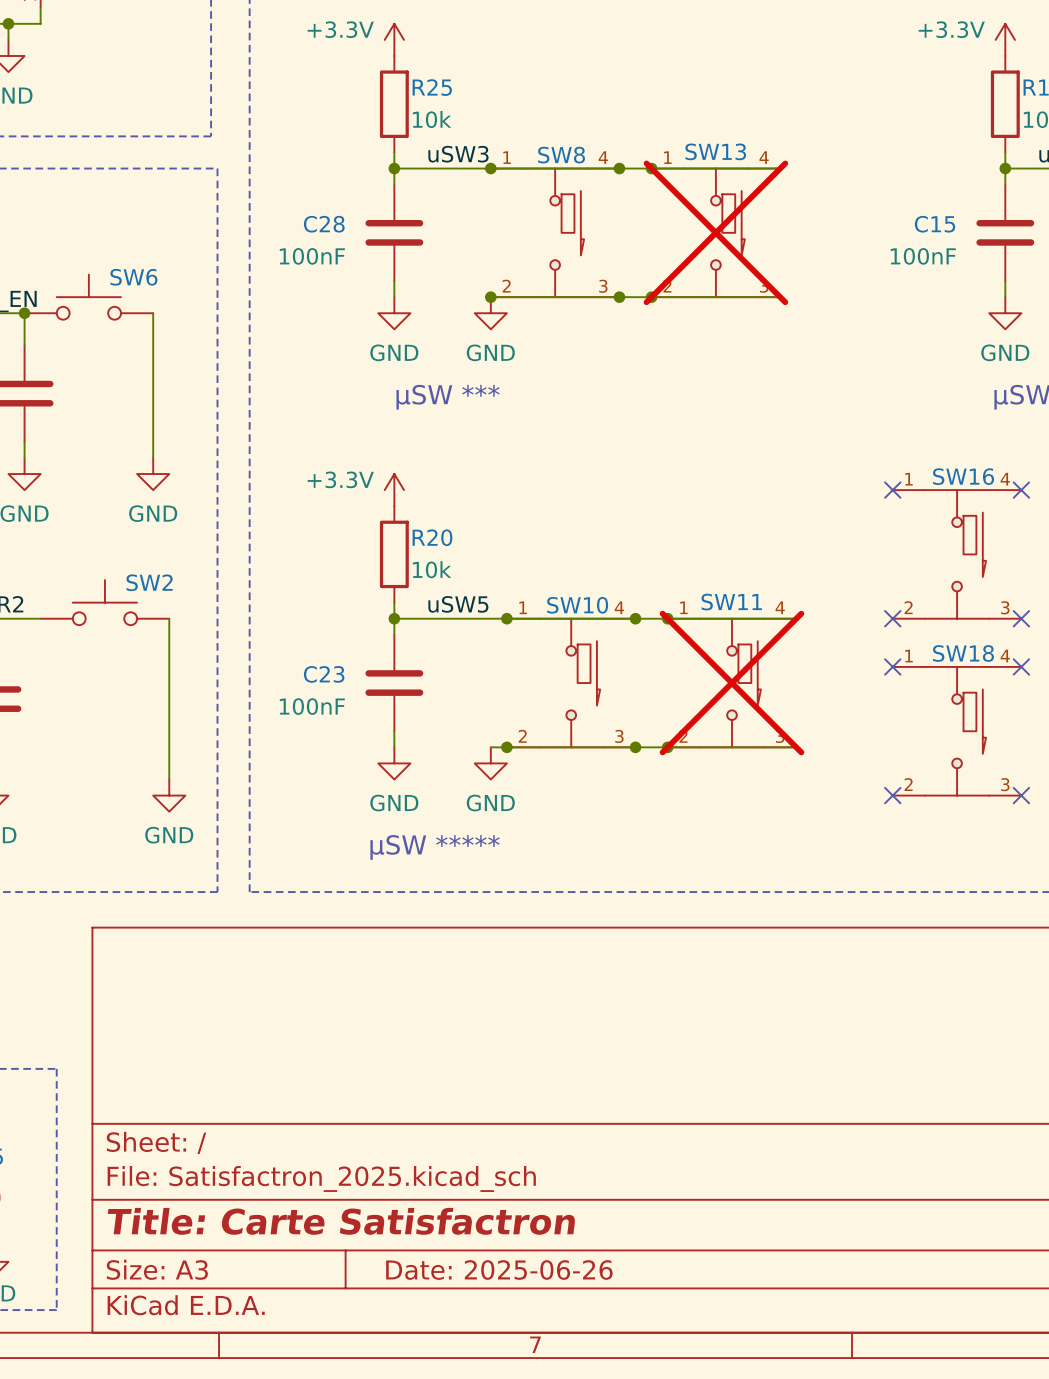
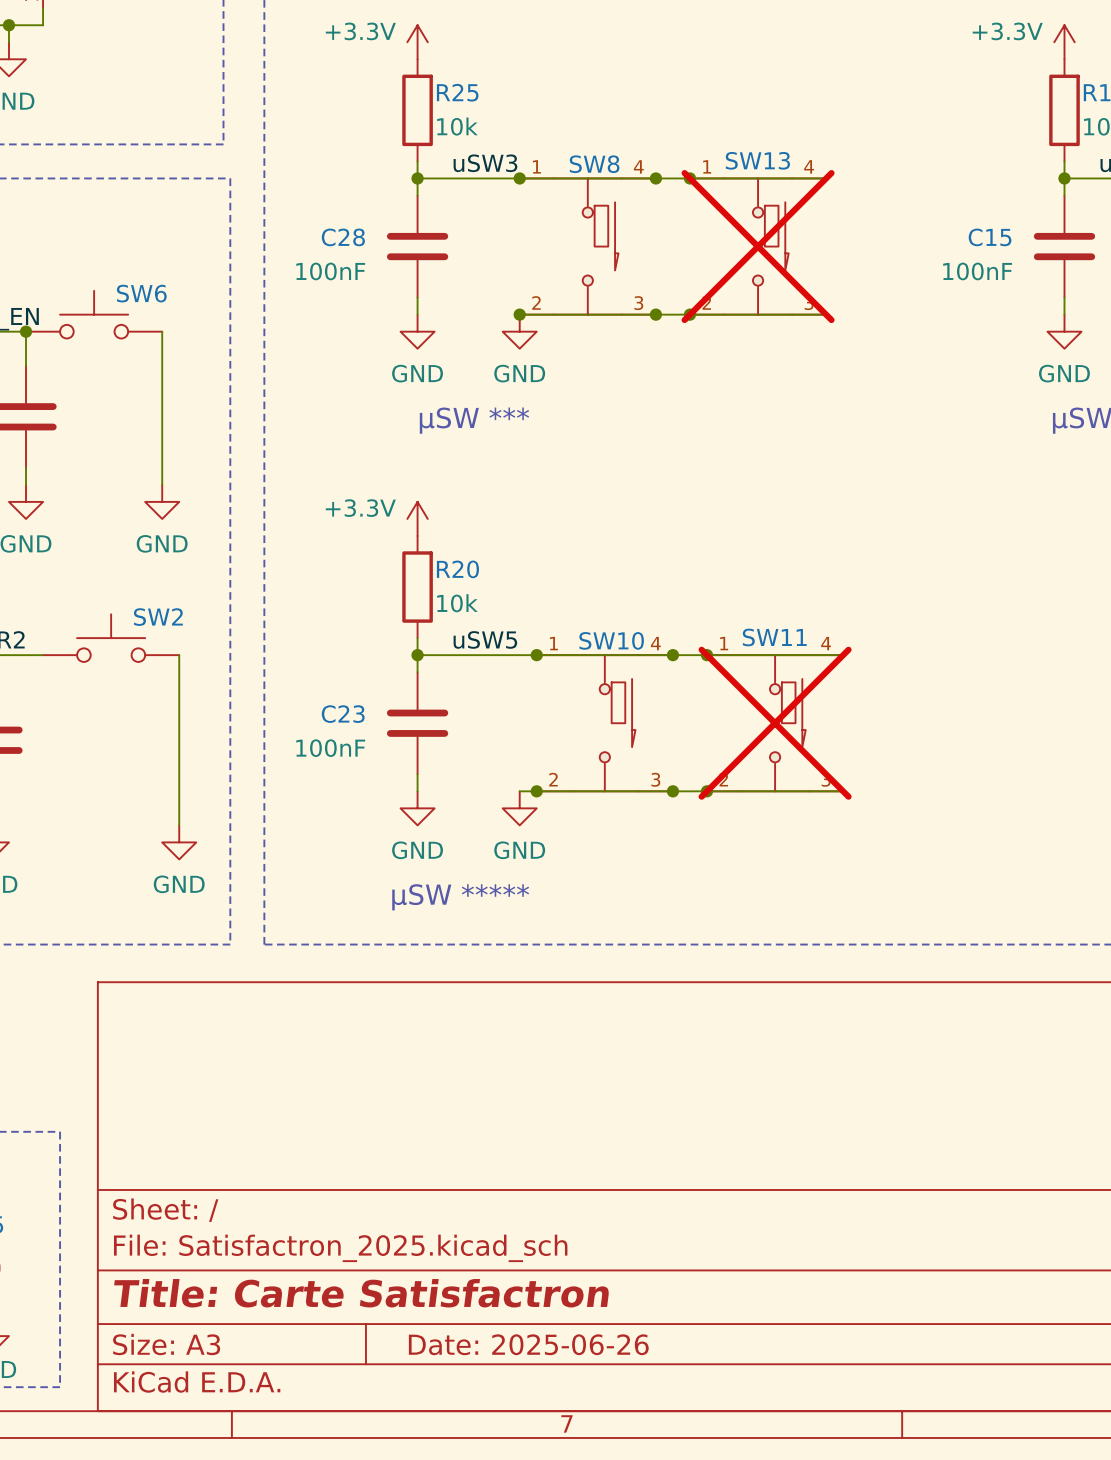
no-connect mark: (892, 490) -> none
no-connect mark: (1021, 490) -> none
SW16: (957, 554) -> none
no-connect mark: (892, 618) -> none
no-connect mark: (1021, 618) -> none
no-connect mark: (892, 666) -> none
no-connect mark: (1021, 666) -> none
SW18: (957, 731) -> none
no-connect mark: (892, 795) -> none
no-connect mark: (1021, 795) -> none

